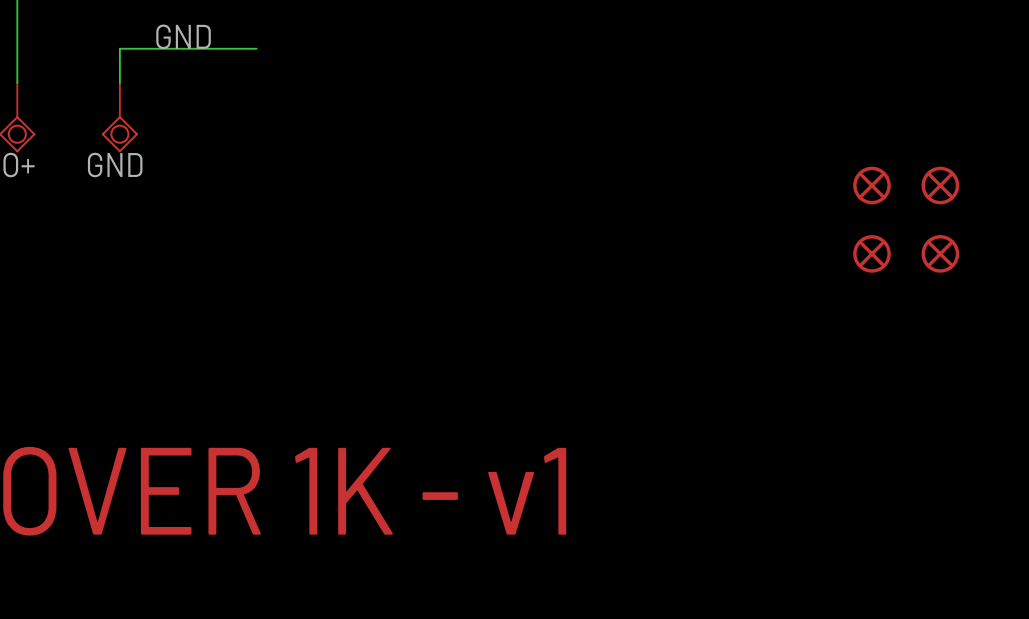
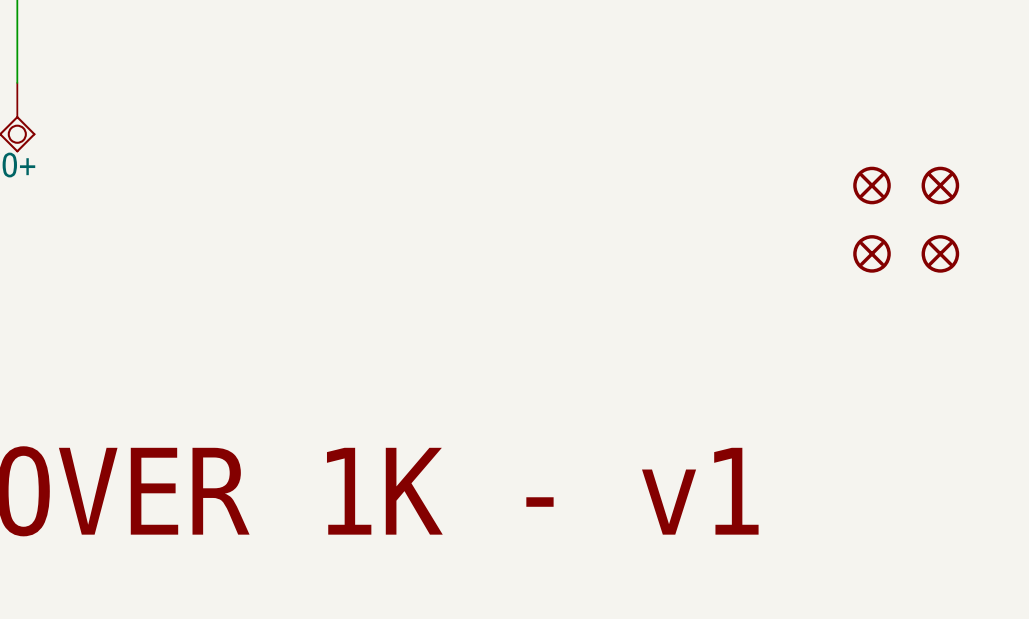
label: GND (183, 36) -> none
wire: (256, 48) (119, 48) (119, 82) -> none
GND: (119, 117) -> none

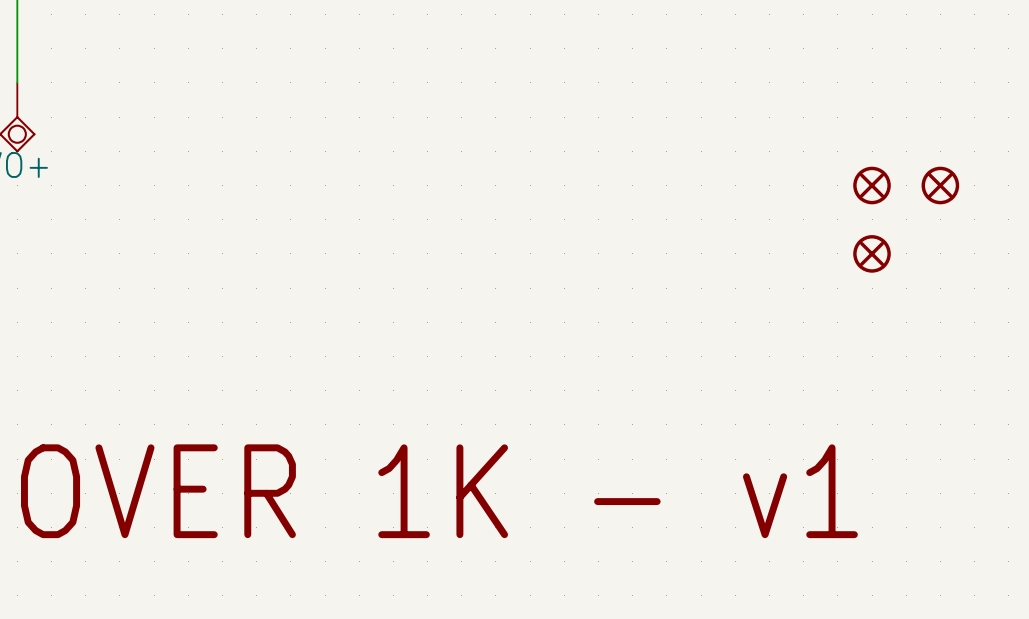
part: (940, 253) -> none

